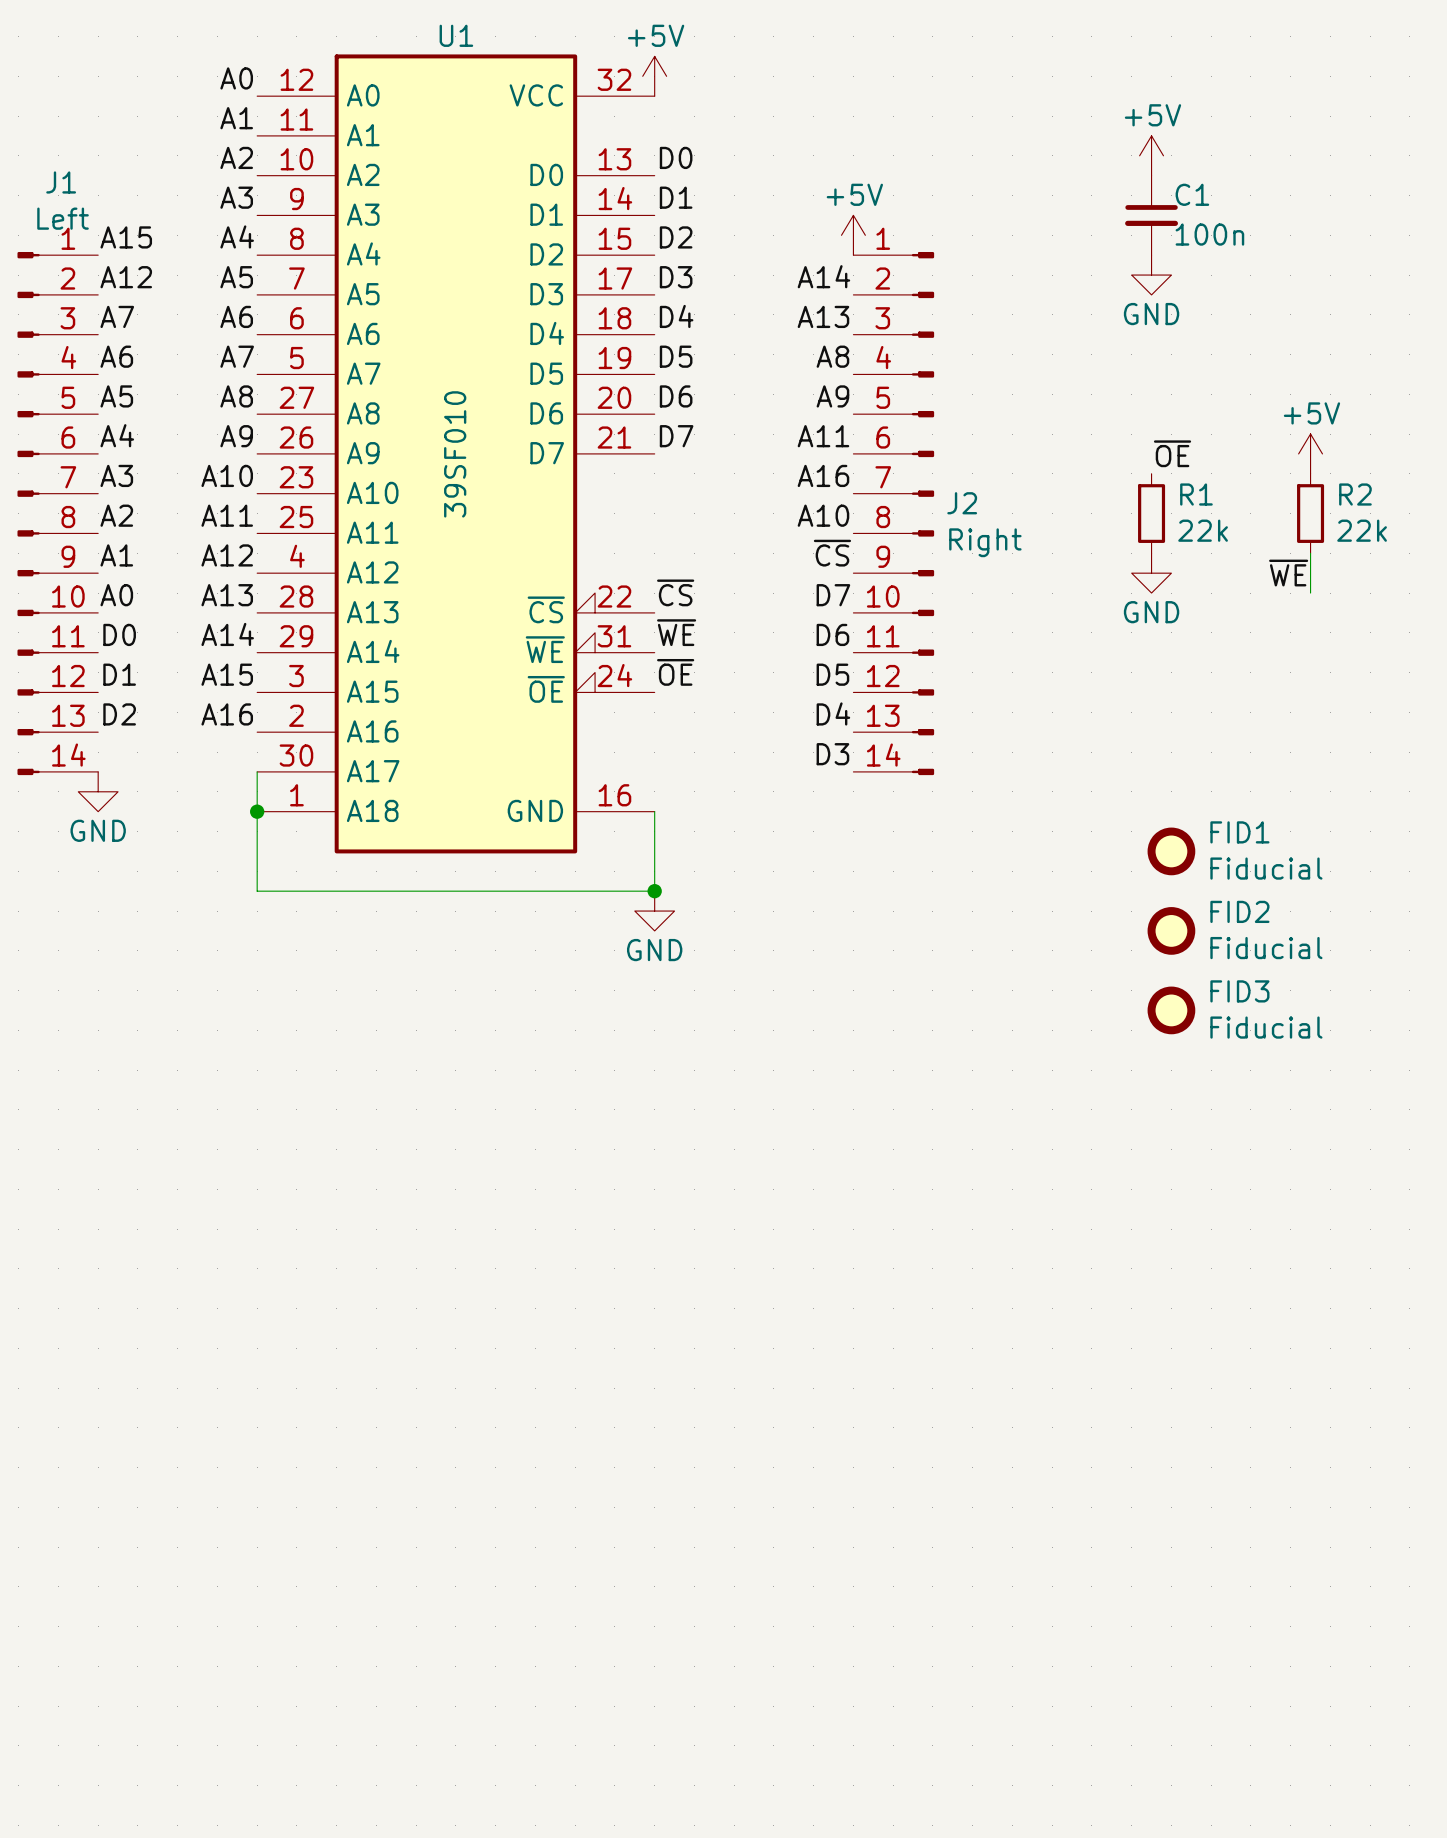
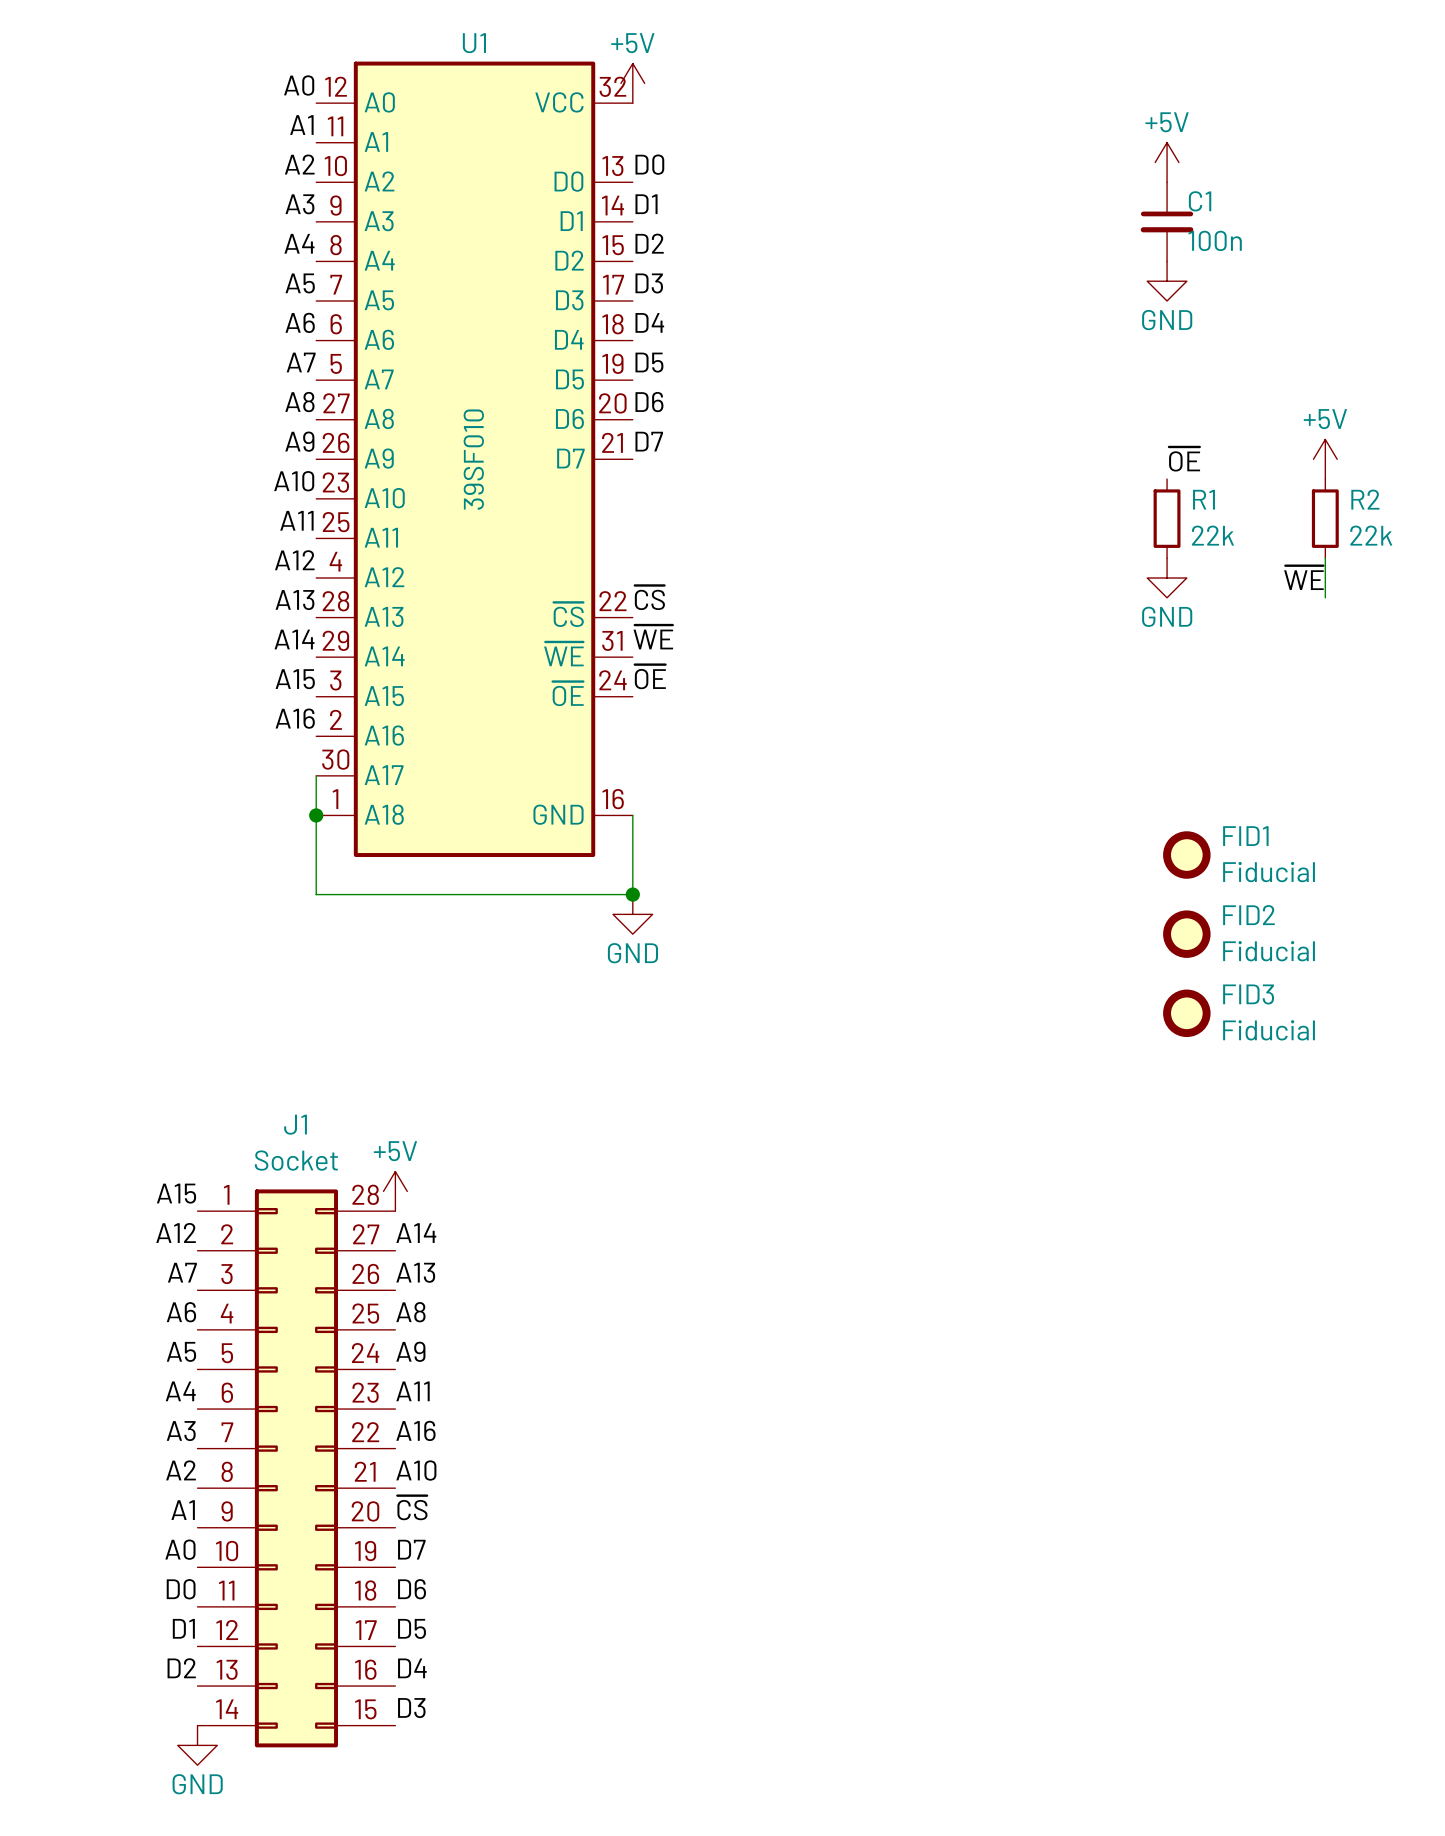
U1 symbol: [257, 54, 655, 854] -> [316, 61, 633, 857]
power symbol position: +5V (654, 76) -> +5V (632, 83)
label position: A0 (236, 78) -> A0 (299, 85)
label position: A1 (236, 118) -> A1 (301, 125)
label position: A2 (236, 157) -> A2 (299, 164)
label position: D0 (676, 157) -> D0 (649, 164)
label position: A3 (236, 197) -> A3 (299, 204)
label position: D1 (676, 197) -> D1 (646, 204)
J1 value: Left (63, 218) -> Socket (296, 1160)
power symbol: +5V (853, 235) -> none
label position: A4 (237, 236) -> A4 (299, 243)
label: A15 (126, 237) -> none
label position: D2 (676, 237) -> D2 (649, 243)
J1 symbol: [17, 251, 99, 776] -> [197, 1189, 396, 1748]
label: A14 (823, 276) -> none
label: A12 (126, 277) -> none
label position: A5 (236, 277) -> A5 (300, 283)
label position: D3 (676, 277) -> D3 (649, 283)
label: A7 (117, 316) -> none
label position: A6 (236, 316) -> A6 (300, 322)
label position: D4 (676, 316) -> D4 (649, 322)
label: A13 (823, 316) -> none
label: A6 (116, 356) -> none
label position: A7 (237, 356) -> A7 (301, 362)
label position: D5 (676, 356) -> D5 (649, 362)
label: A8 (832, 356) -> none
label: A5 (116, 396) -> none
label position: A8 (236, 396) -> A8 (299, 402)
label position: D6 (676, 396) -> D6 (649, 402)
label: A9 (832, 396) -> none
label: A4 (117, 435) -> none
label position: A9 (236, 436) -> A9 (299, 441)
label position: D7 (676, 436) -> D7 (649, 441)
label: A11 (823, 436) -> none
label: A3 (116, 475) -> none
label position: A10 (227, 475) -> A10 (294, 481)
label: A16 (823, 475) -> none
J2: Right (893, 513) -> none
label: A2 (116, 515) -> none
label position: A11 (227, 515) -> A11 (296, 520)
label: A10 (823, 515) -> none
label: ~{CS} (832, 553) -> none
label: A1 (116, 555) -> none
label position: A12 (227, 555) -> A12 (294, 560)
label position: ~{CS} (675, 592) -> ~{CS} (649, 597)
label: A0 (116, 595) -> none
label position: A13 (227, 595) -> A13 (294, 600)
label: D7 (833, 595) -> none
label position: ~{WE} (676, 632) -> ~{WE} (653, 637)
label: D0 (119, 634) -> none
label position: A14 (227, 634) -> A14 (294, 639)
label: D6 (832, 634) -> none
label position: ~{OE} (675, 672) -> ~{OE} (650, 676)
label: D1 (119, 674) -> none
label position: A15 (227, 674) -> A15 (295, 679)
label: D5 (832, 674) -> none
label: D4 (833, 713) -> none
label: D2 (119, 714) -> none
label position: A16 (227, 714) -> A16 (295, 718)
label: D3 (832, 754) -> none
wire: (257, 771) (257, 891) (296, 891) -> (316, 775) (316, 894)
power symbol: GND (98, 791) -> none
junction position: (257, 811) -> (316, 815)
wire: (654, 811) (654, 891) (614, 891) -> (632, 815) (632, 894)
junction position: (654, 891) -> (632, 894)
power symbol position: GND (654, 911) -> GND (632, 914)
power symbol: none -> +5V (395, 1191)
label: none -> A15 (176, 1193)
label: none -> A14 (416, 1233)
label: none -> A12 (176, 1232)
label: none -> A7 (182, 1272)
label: none -> A13 (415, 1272)
label: none -> A6 (181, 1312)
label: none -> A8 (410, 1312)
label: none -> A5 (181, 1351)
label: none -> A9 (410, 1351)
label: none -> A4 (180, 1391)
label: none -> A11 (413, 1391)
label: none -> A3 (181, 1431)
label: none -> A16 (415, 1430)
label: none -> A2 (181, 1470)
label: none -> A10 (416, 1470)
label: none -> ~{CS} (412, 1507)
label: none -> A1 (183, 1510)
label: none -> A0 (180, 1549)
label: none -> D7 (411, 1549)
label: none -> D0 (181, 1589)
label: none -> D6 (412, 1589)
label: none -> D1 (183, 1628)
label: none -> D5 (412, 1628)
label: none -> D4 (412, 1668)
label: none -> D2 (181, 1668)
label: none -> D3 (411, 1708)
power symbol: none -> GND (197, 1745)

